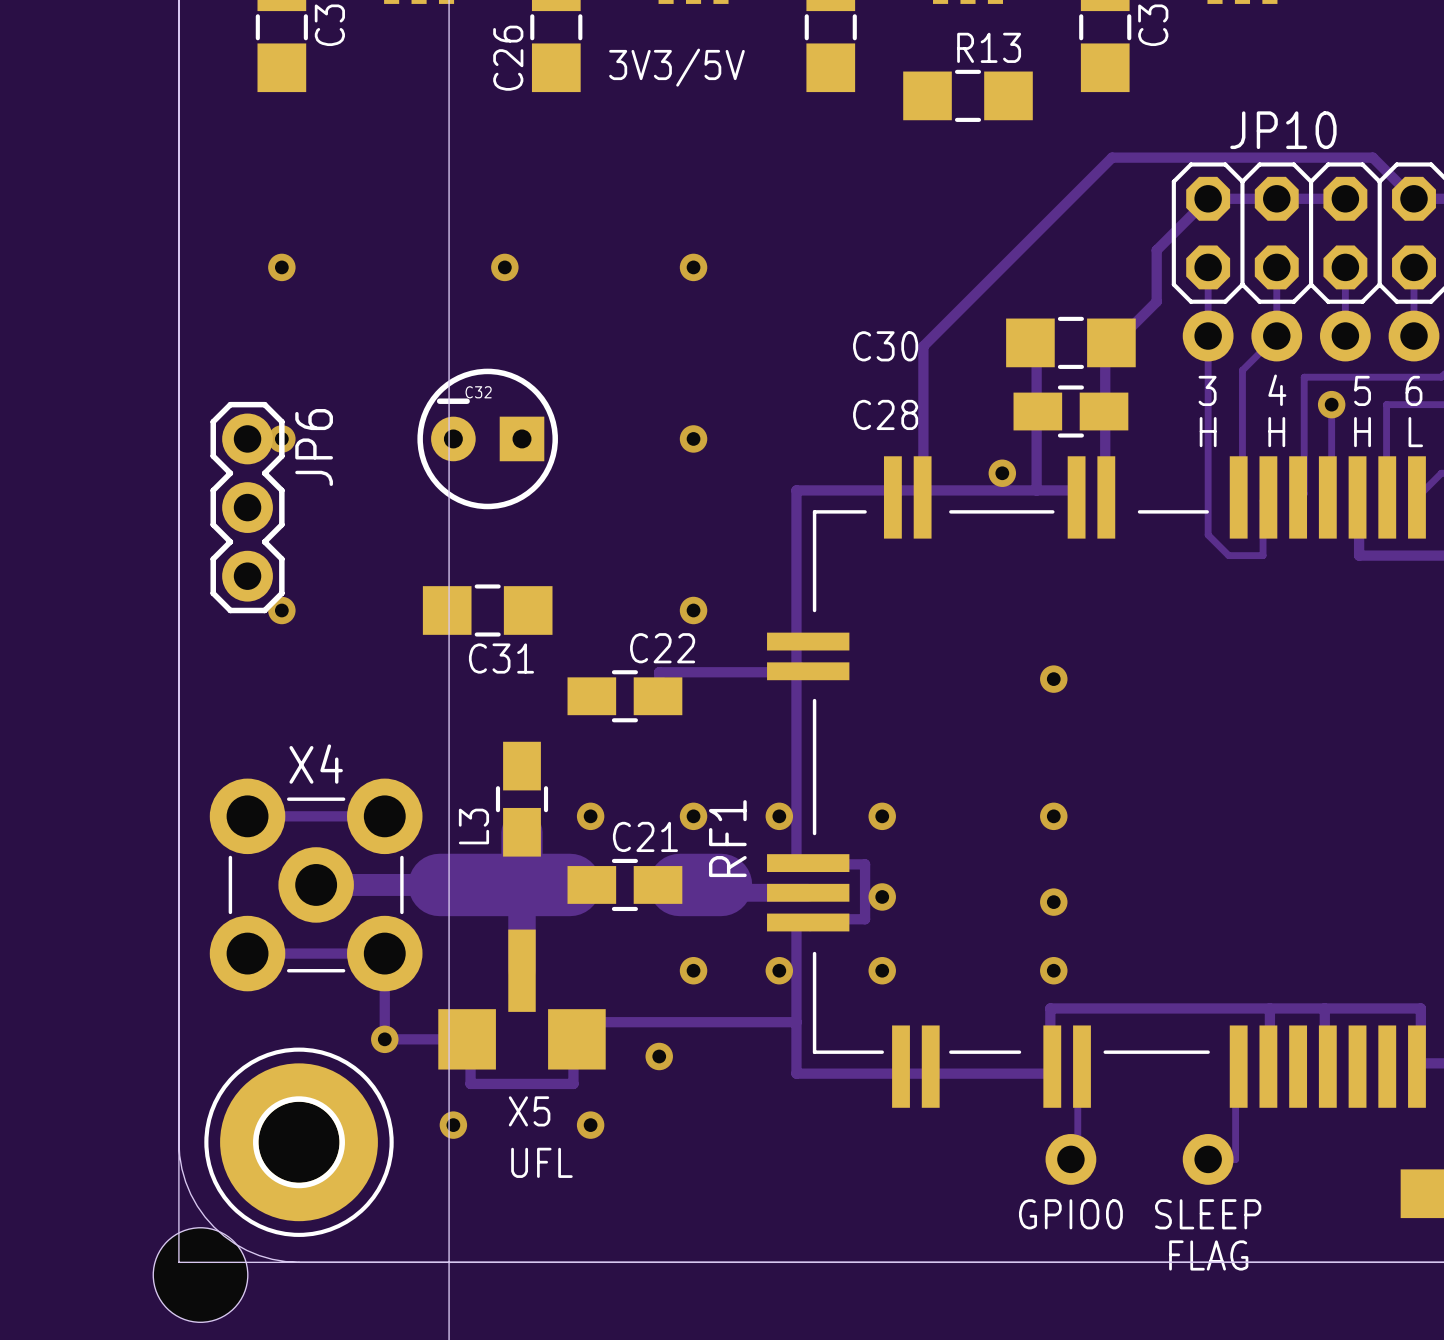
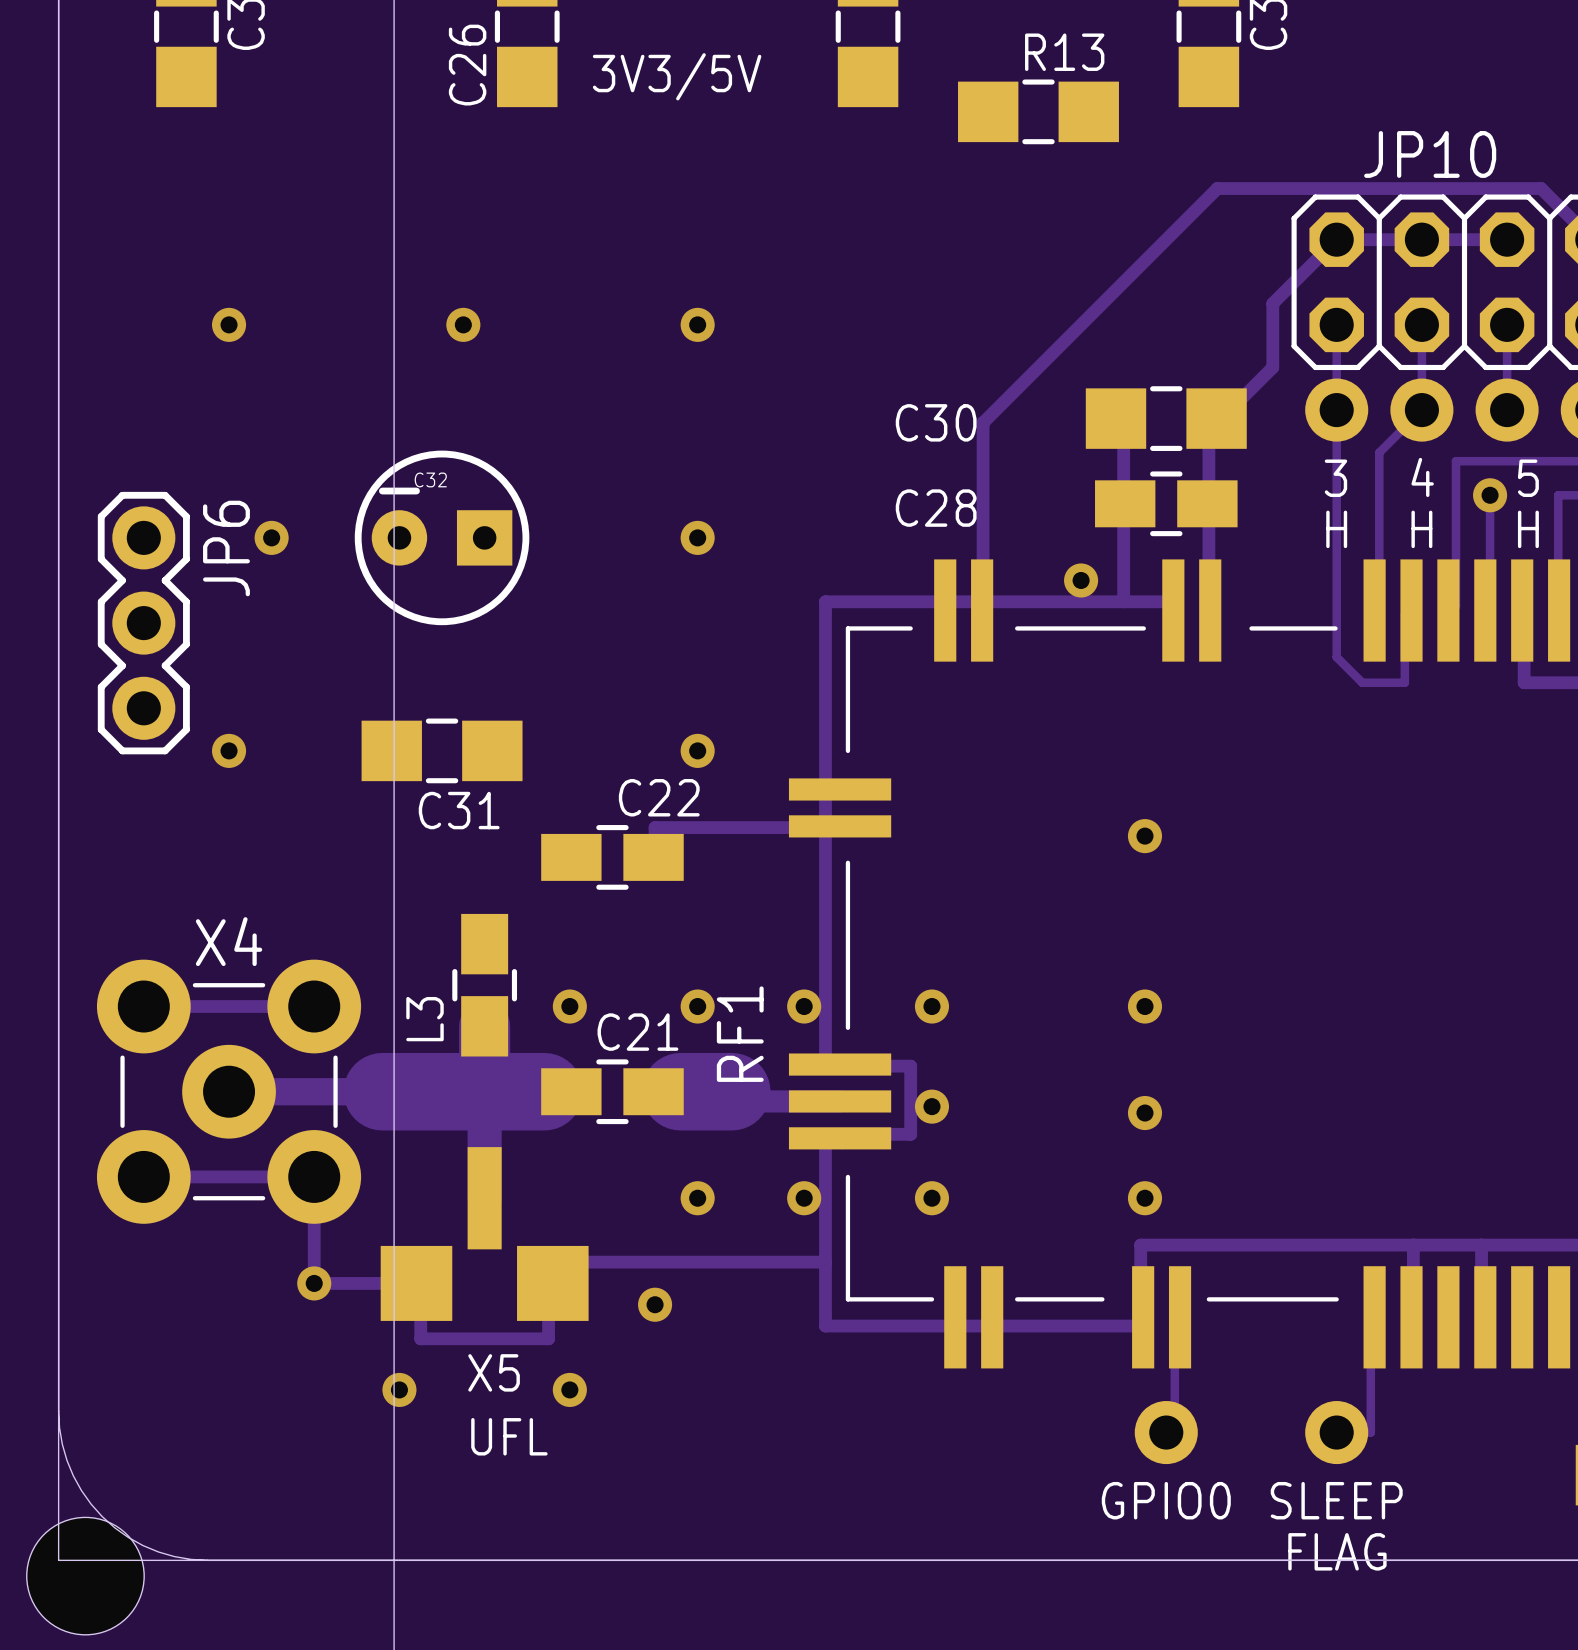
via position: (281, 267) -> (229, 324)
via position: (281, 438) -> (271, 537)
via position: (281, 610) -> (229, 750)
part: (299, 1142) -> none

